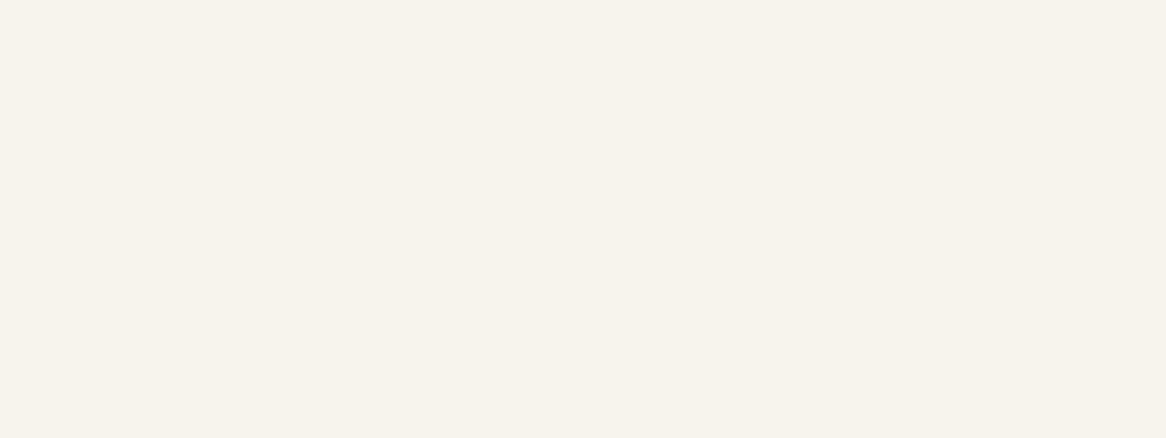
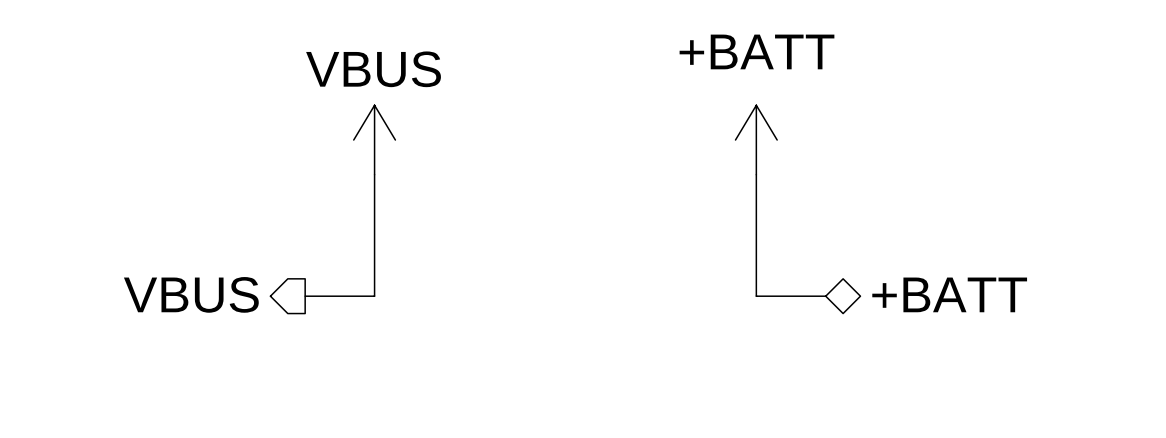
power symbol: none -> VBUS (374, 140)
power symbol: none -> +BATT (756, 140)
wire: none -> (374, 174) (374, 296) (305, 296)
wire: none -> (756, 174) (756, 296) (825, 296)
hierarchical label: none -> VBUS (191, 294)
hierarchical label: none -> +BATT (949, 294)

